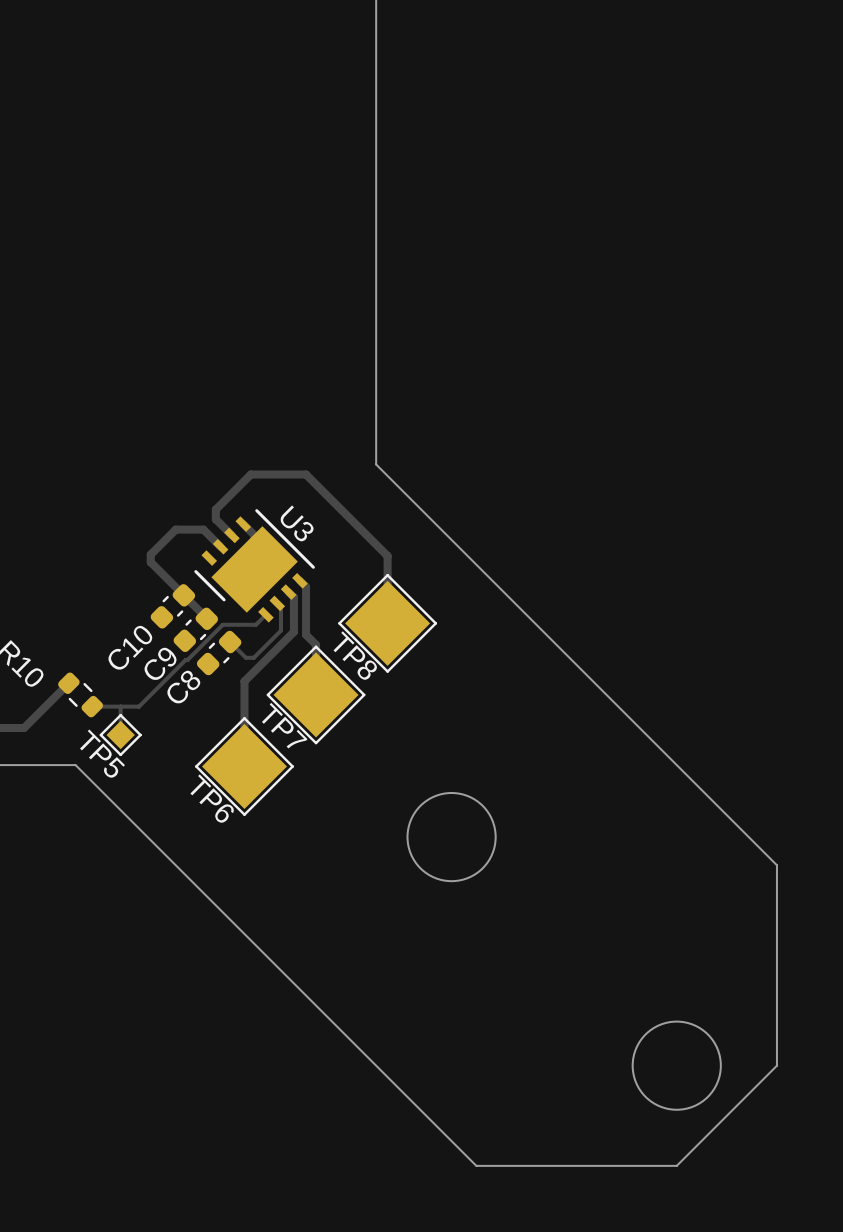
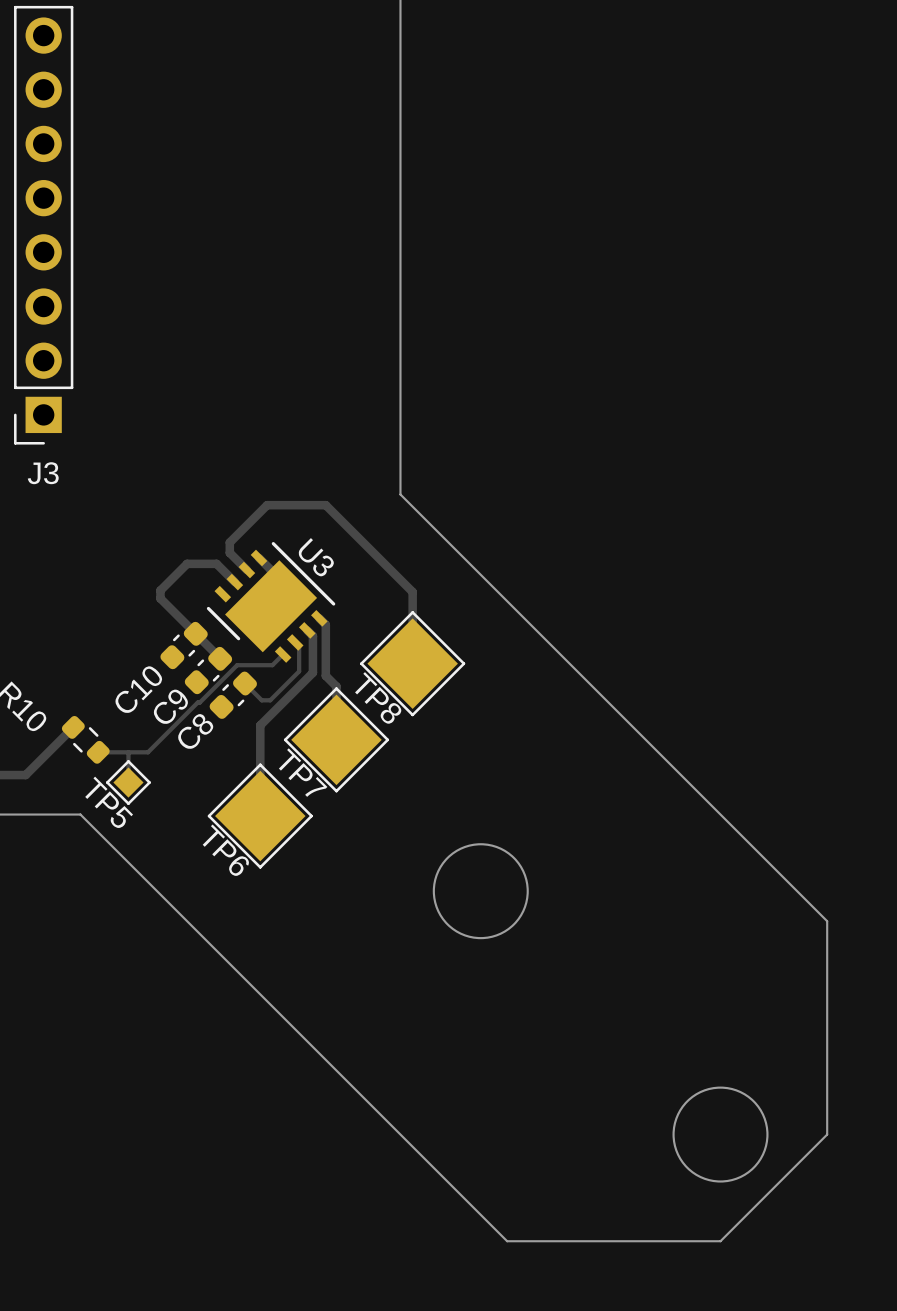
J3: none -> (43, 225)

